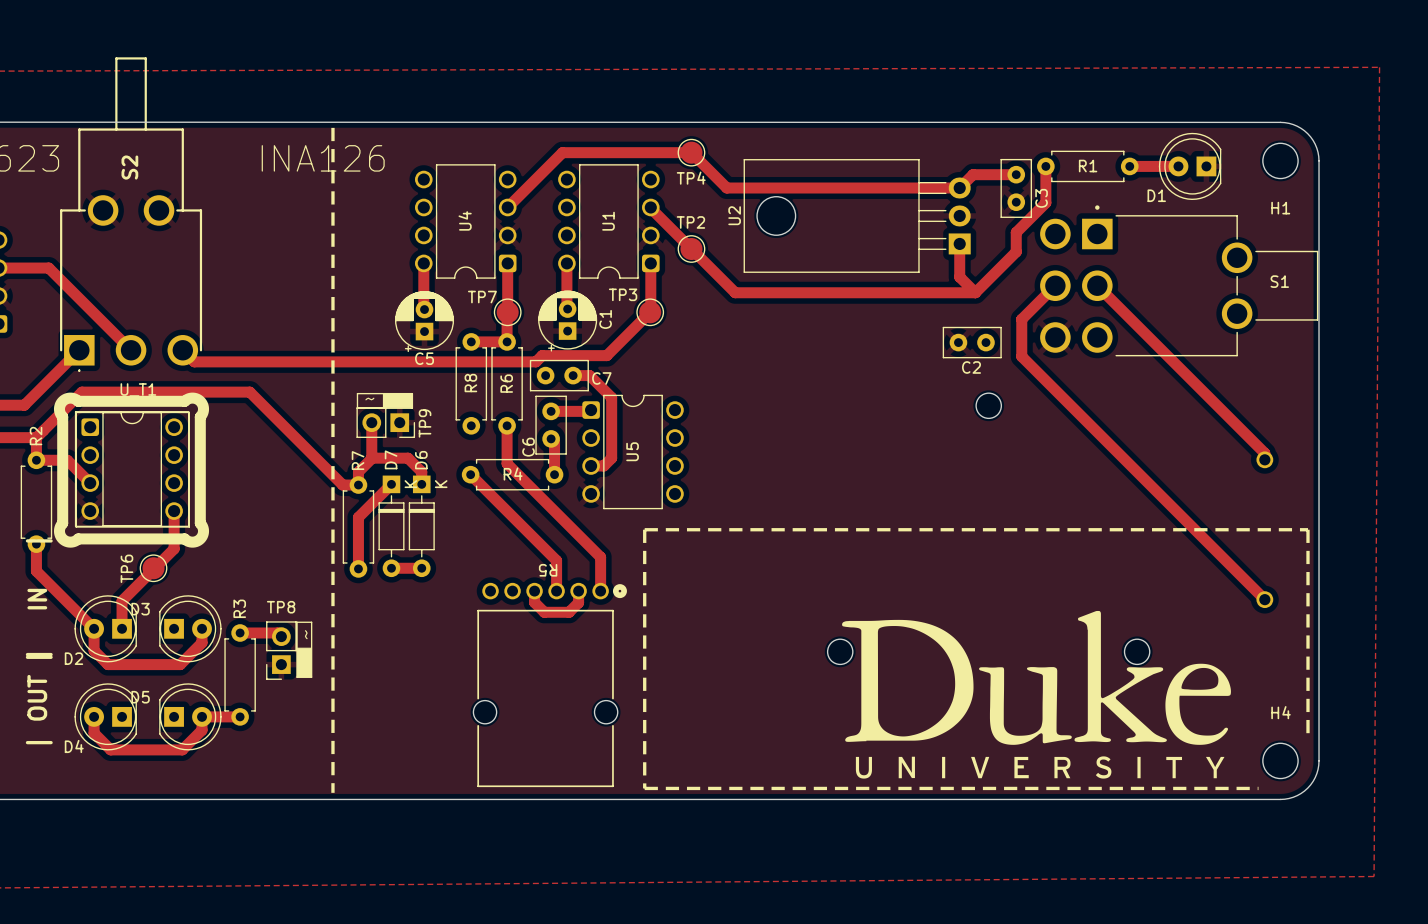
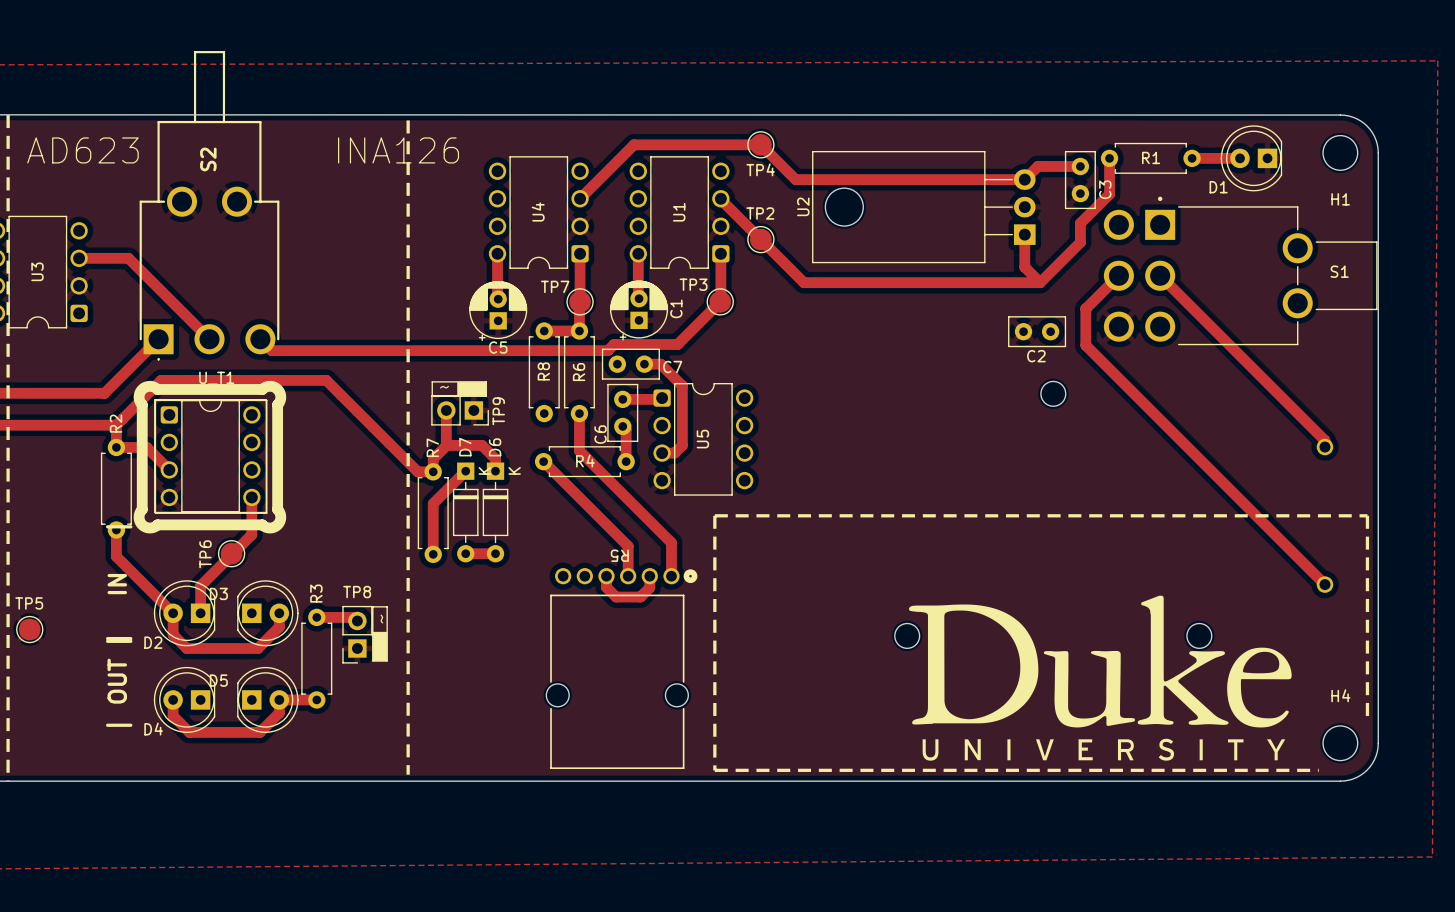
U2 footprint: [743, 159, 971, 273] -> [812, 151, 1036, 264]

